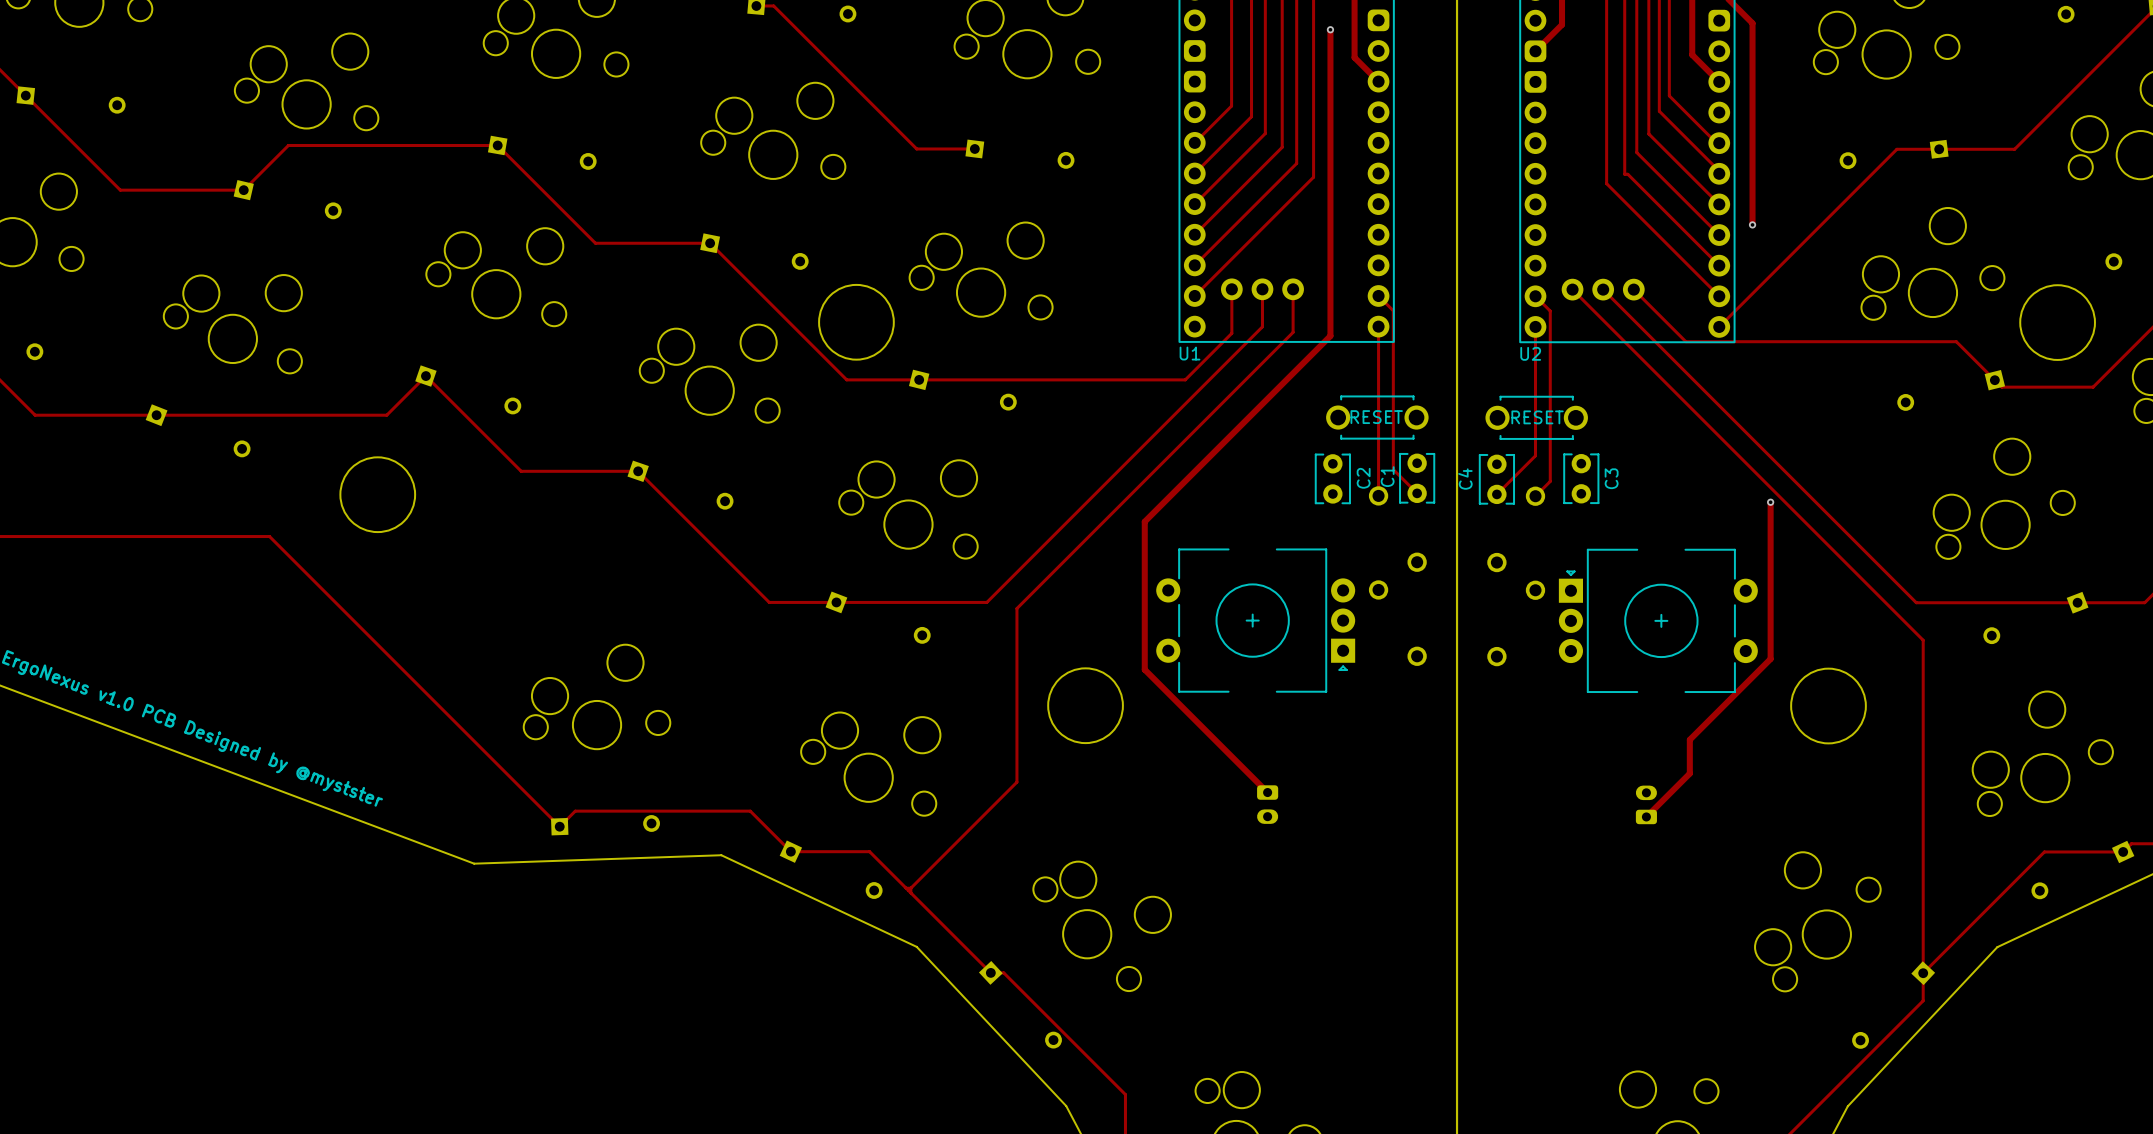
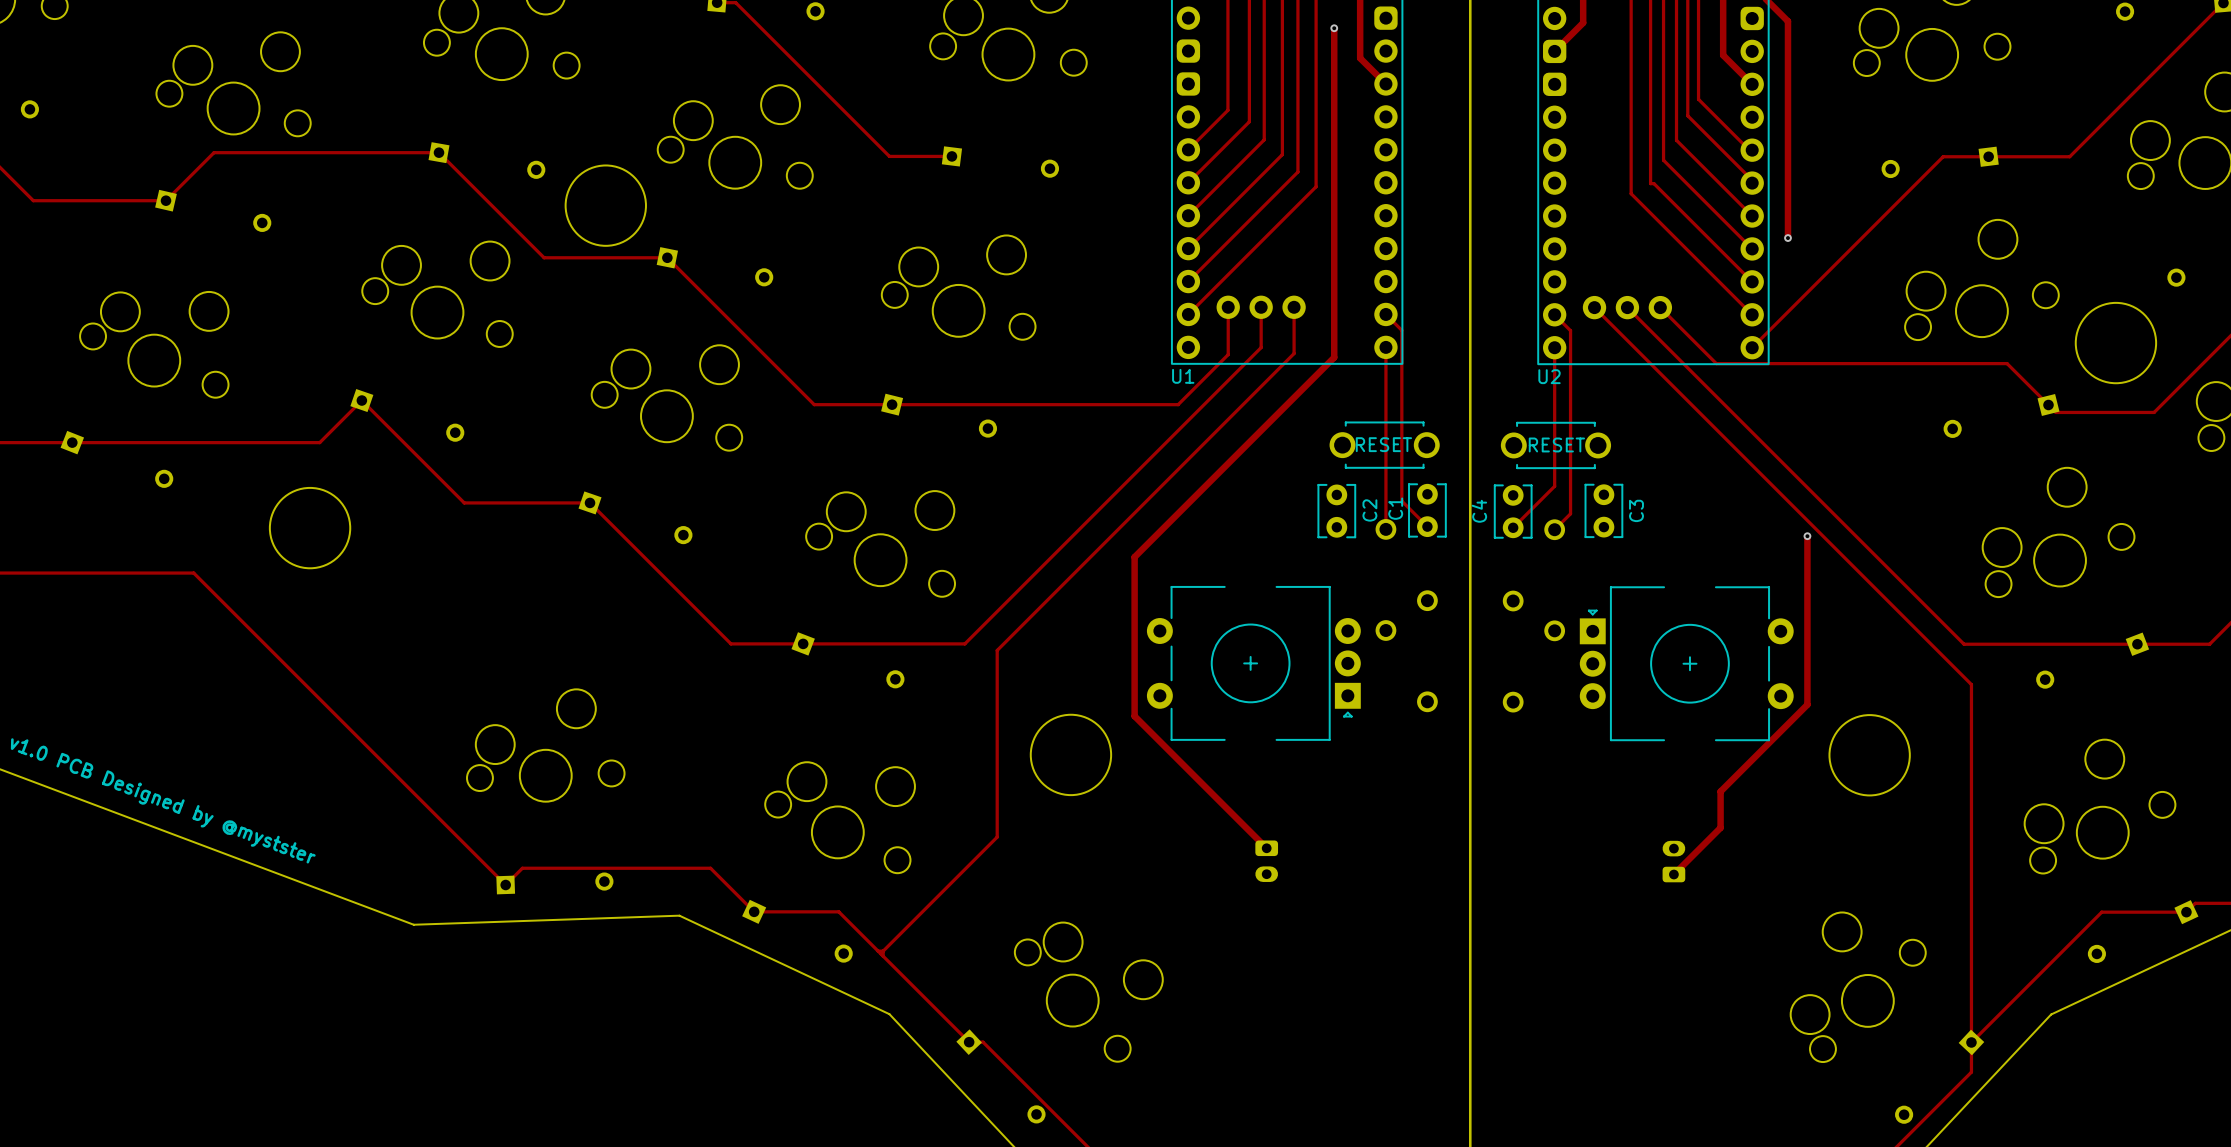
round board edge position: (856, 322) -> (605, 205)

